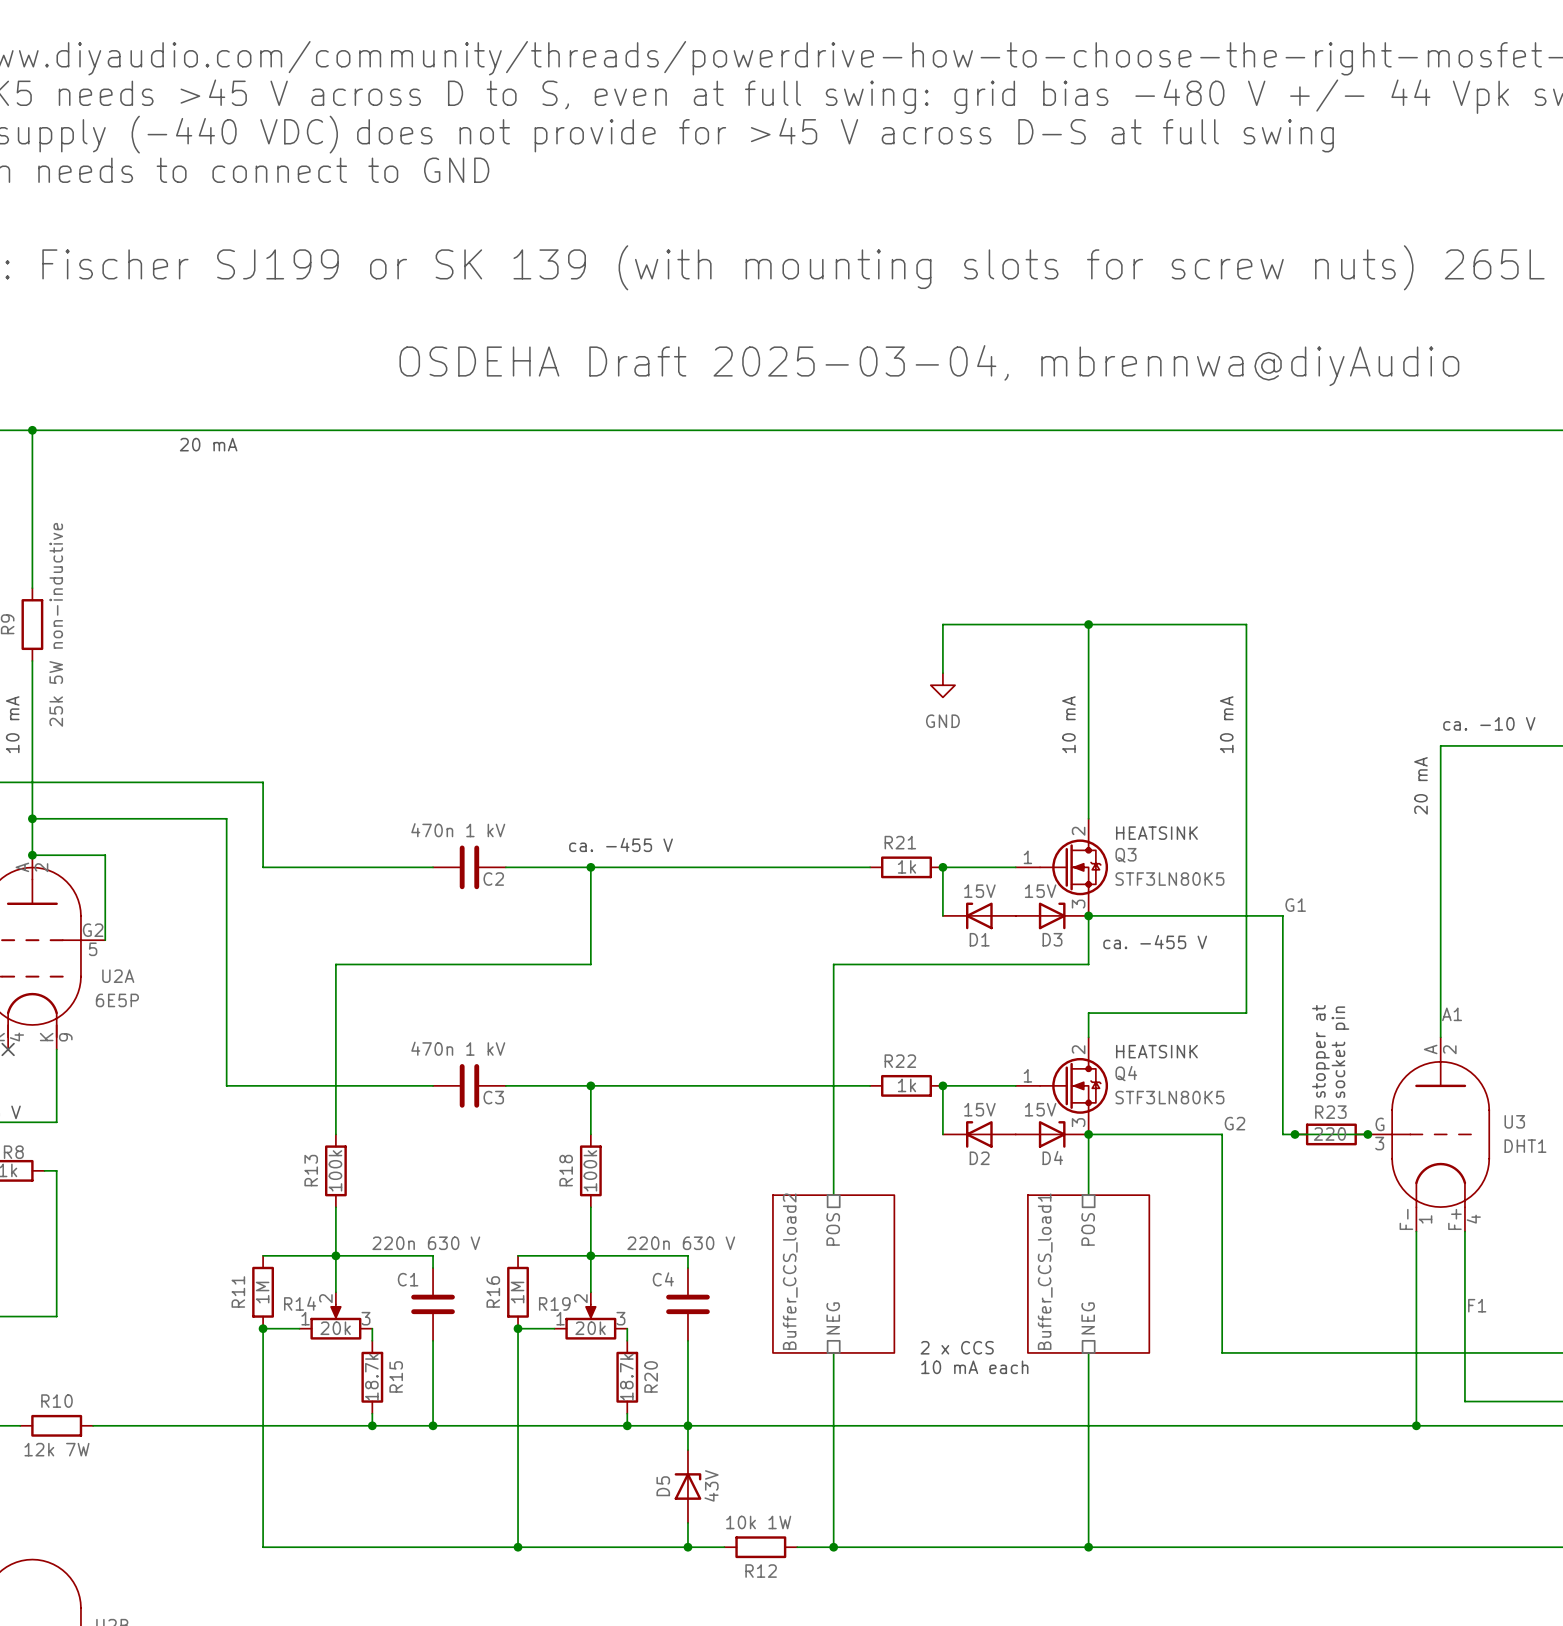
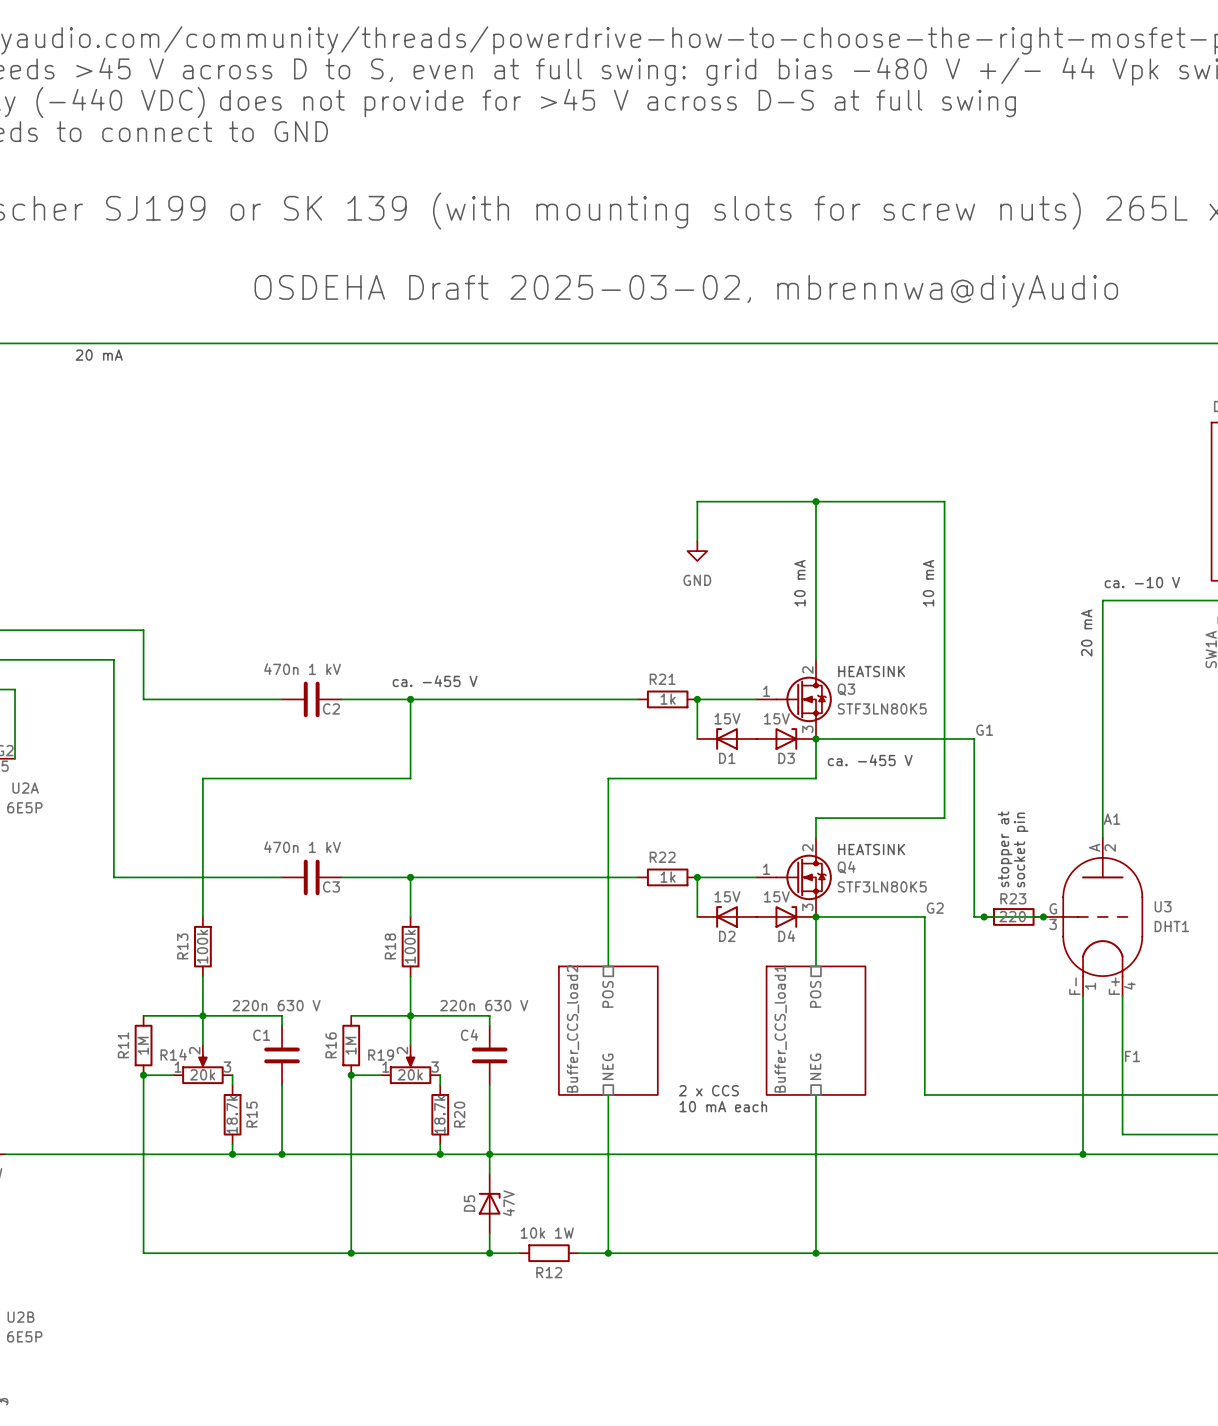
text: OSDEHA Draft 2025-03-04, mbrennwa@diyAudio (929, 365) -> OSDEHA Draft 2025-03-02, mbrennwa@diyAudio (686, 291)
D5 value: 43V (711, 1485) -> 47V (508, 1203)

